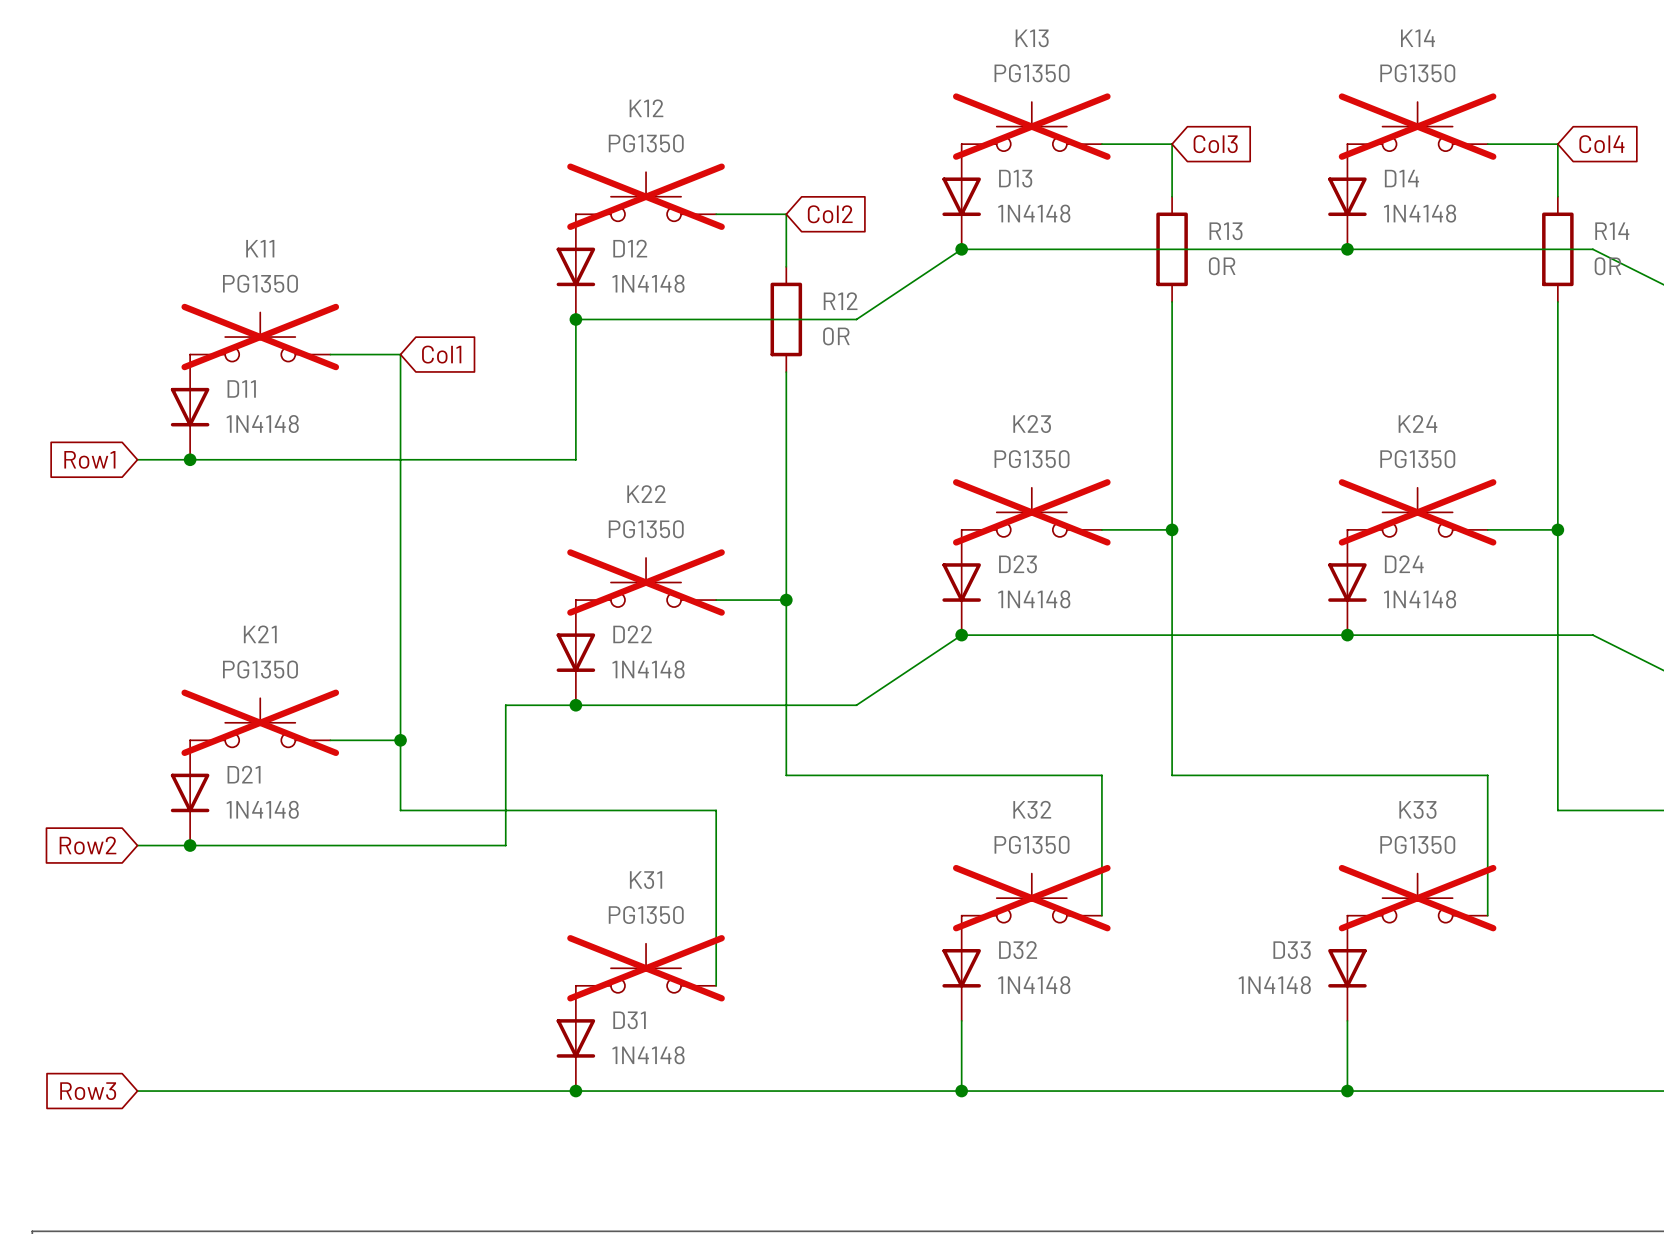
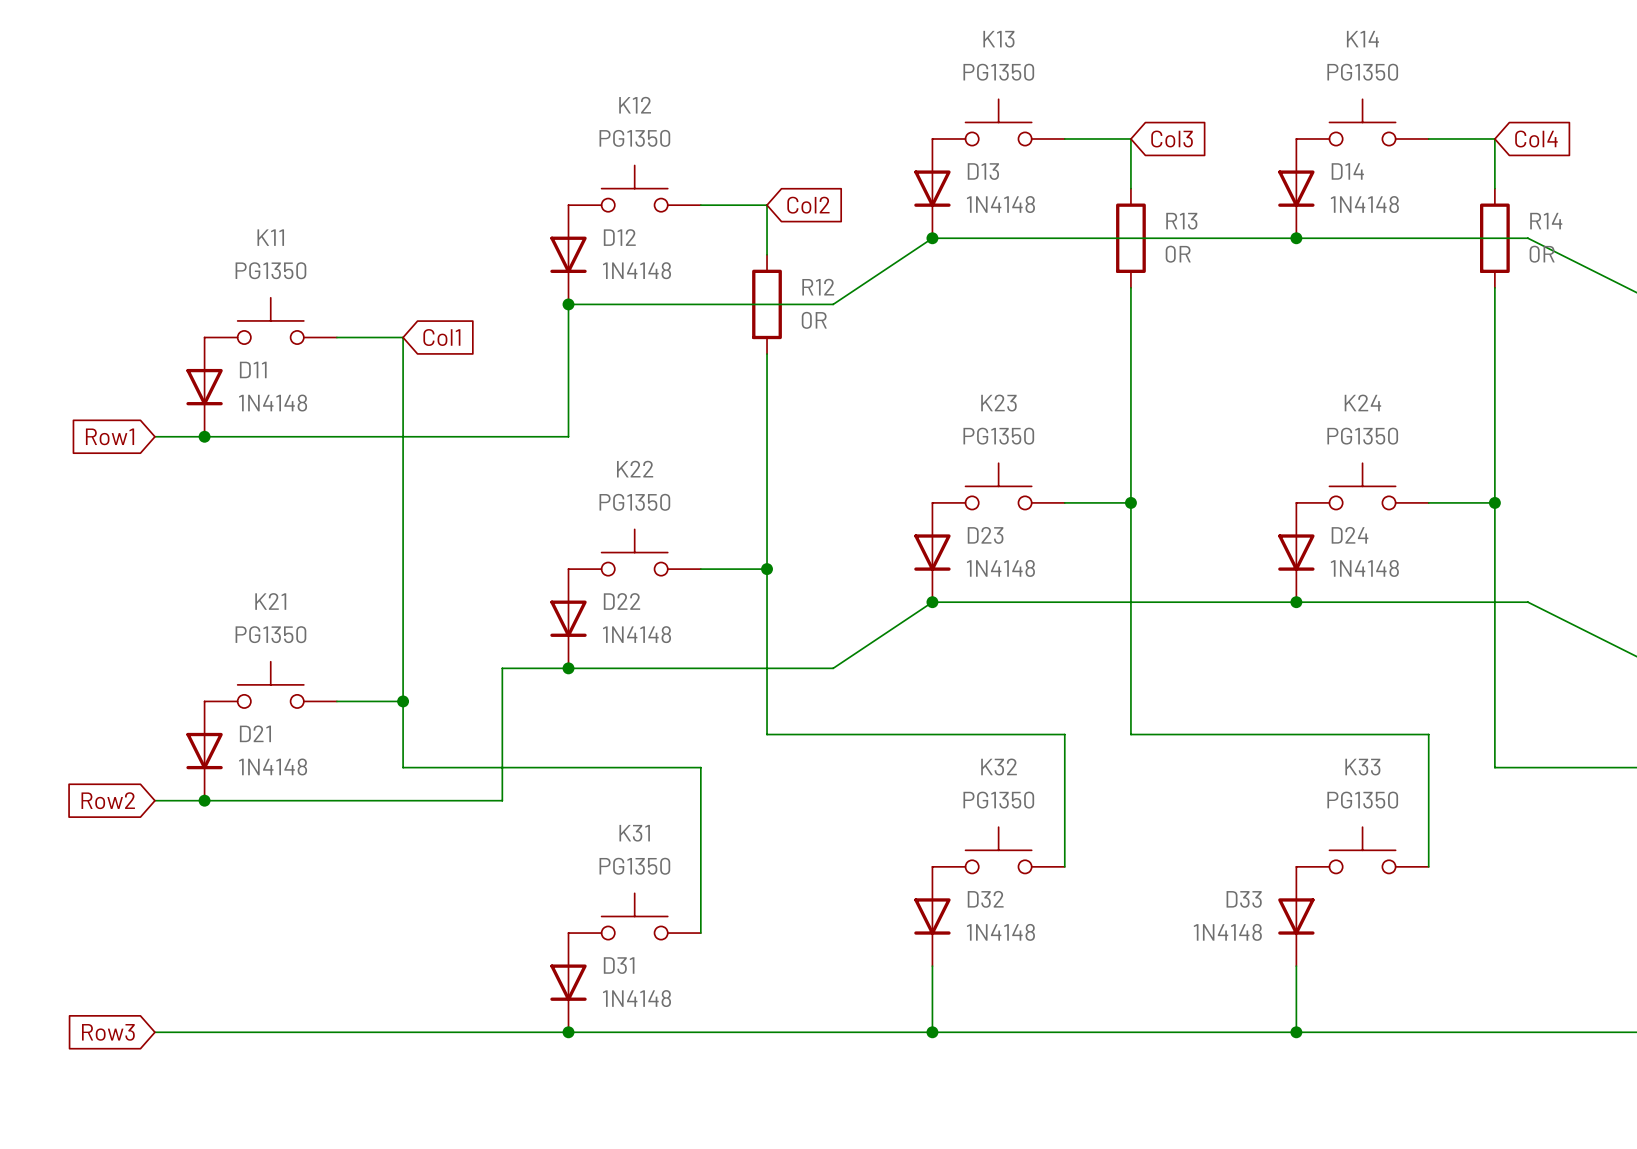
K13 do-not-place cross: (1031, 126) -> none
K14 do-not-place cross: (1417, 126) -> none
K12 do-not-place cross: (646, 196) -> none
K11 do-not-place cross: (260, 337) -> none
K23 do-not-place cross: (1031, 512) -> none
K24 do-not-place cross: (1417, 512) -> none
K22 do-not-place cross: (646, 582) -> none
K21 do-not-place cross: (260, 722) -> none
K32 do-not-place cross: (1031, 898) -> none
K33 do-not-place cross: (1417, 898) -> none
K31 do-not-place cross: (646, 968) -> none

